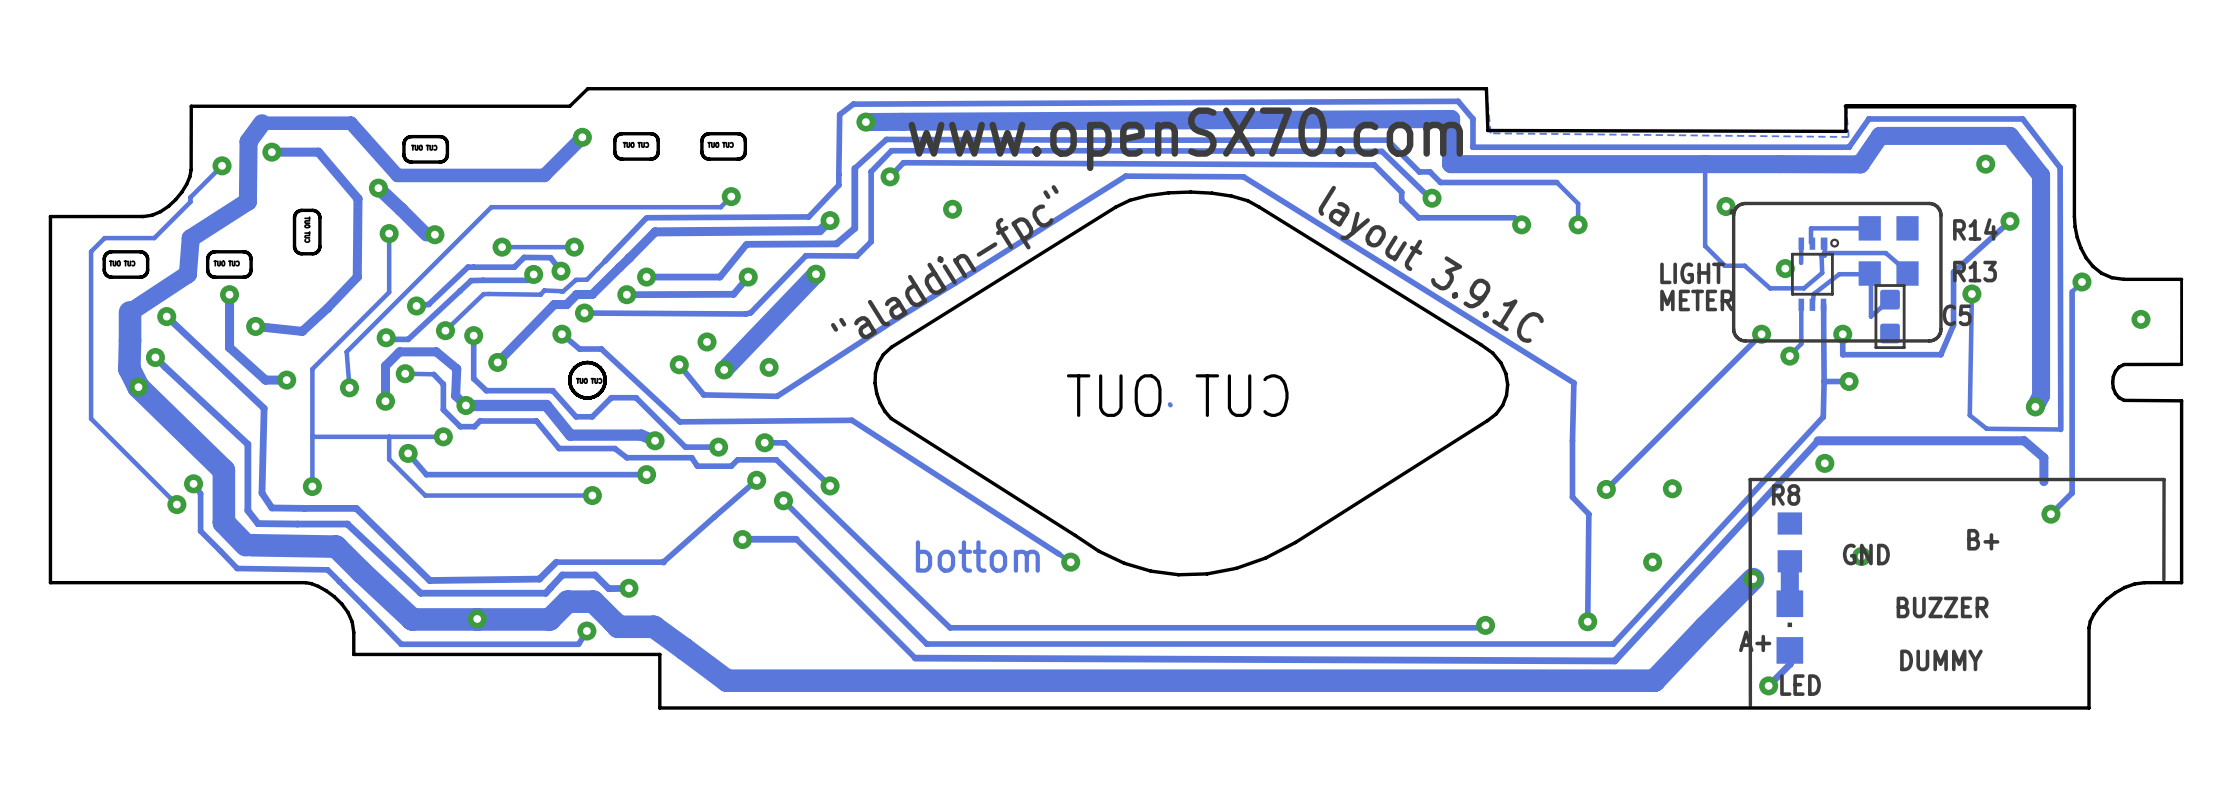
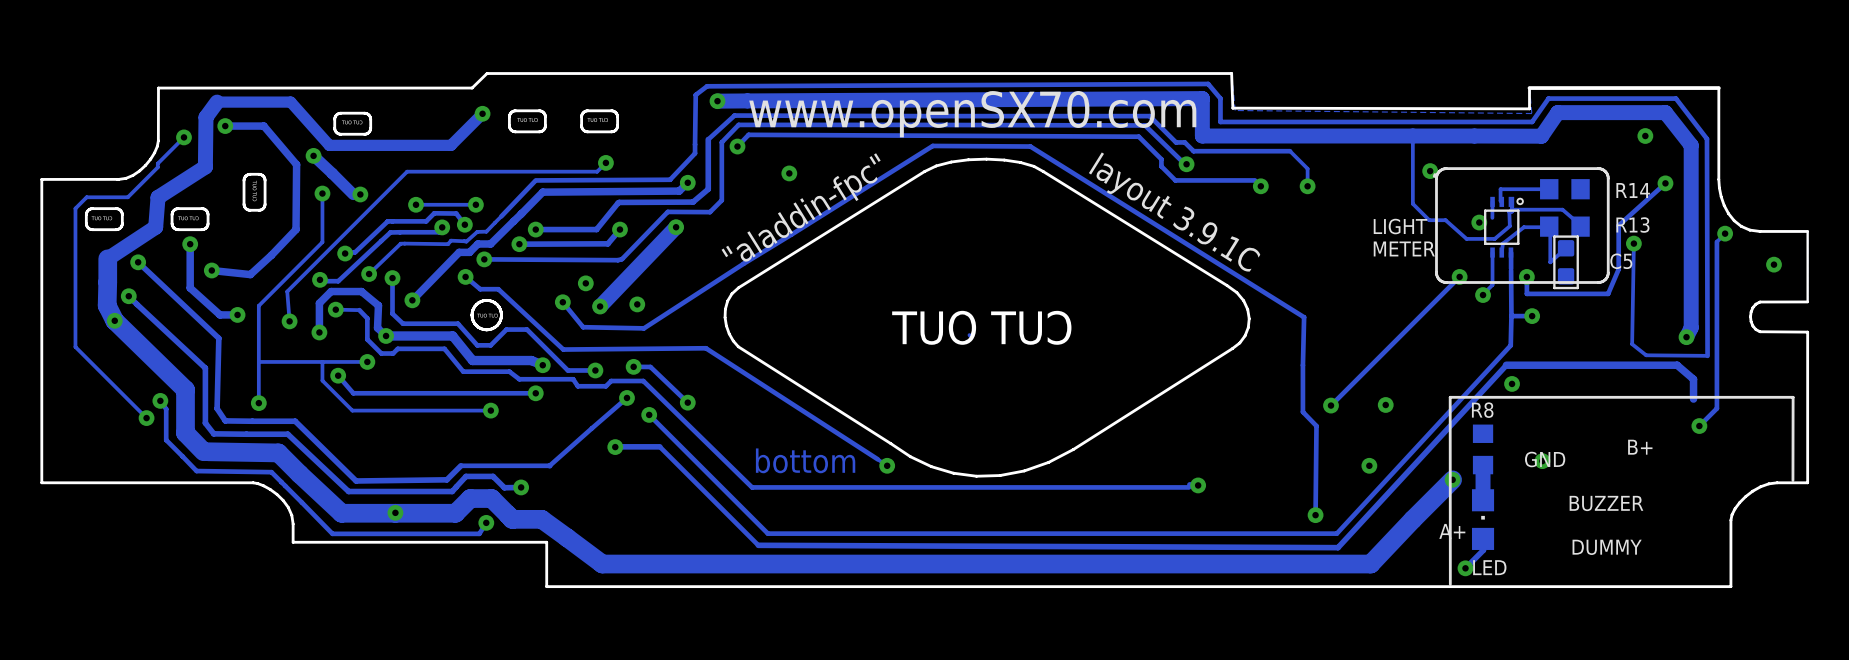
track: (776, 459) (950, 627) (1483, 627) (1485, 625) -> (643, 381) (752, 487) (1188, 487) (1189, 484) (1199, 484)
via position: (1485, 625) -> (1198, 485)

